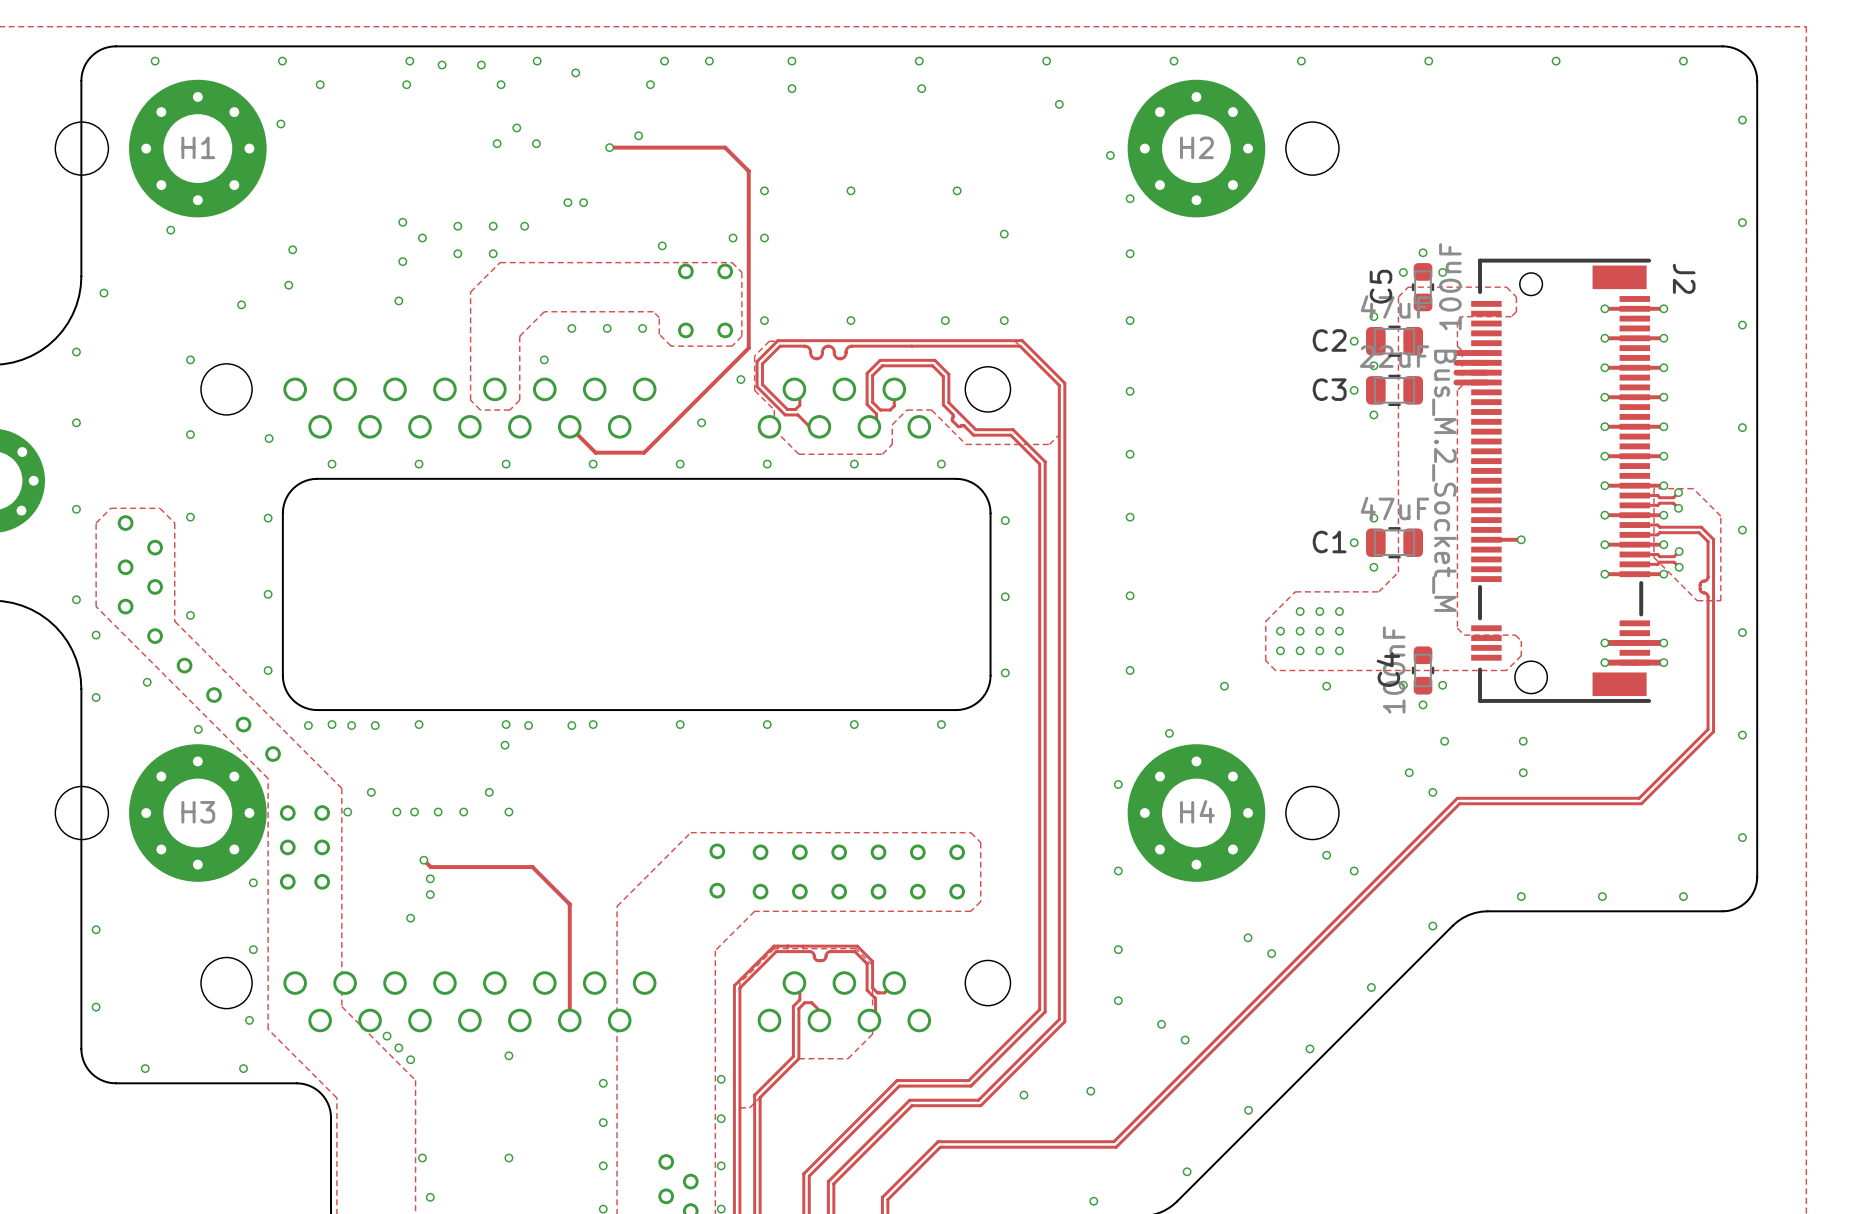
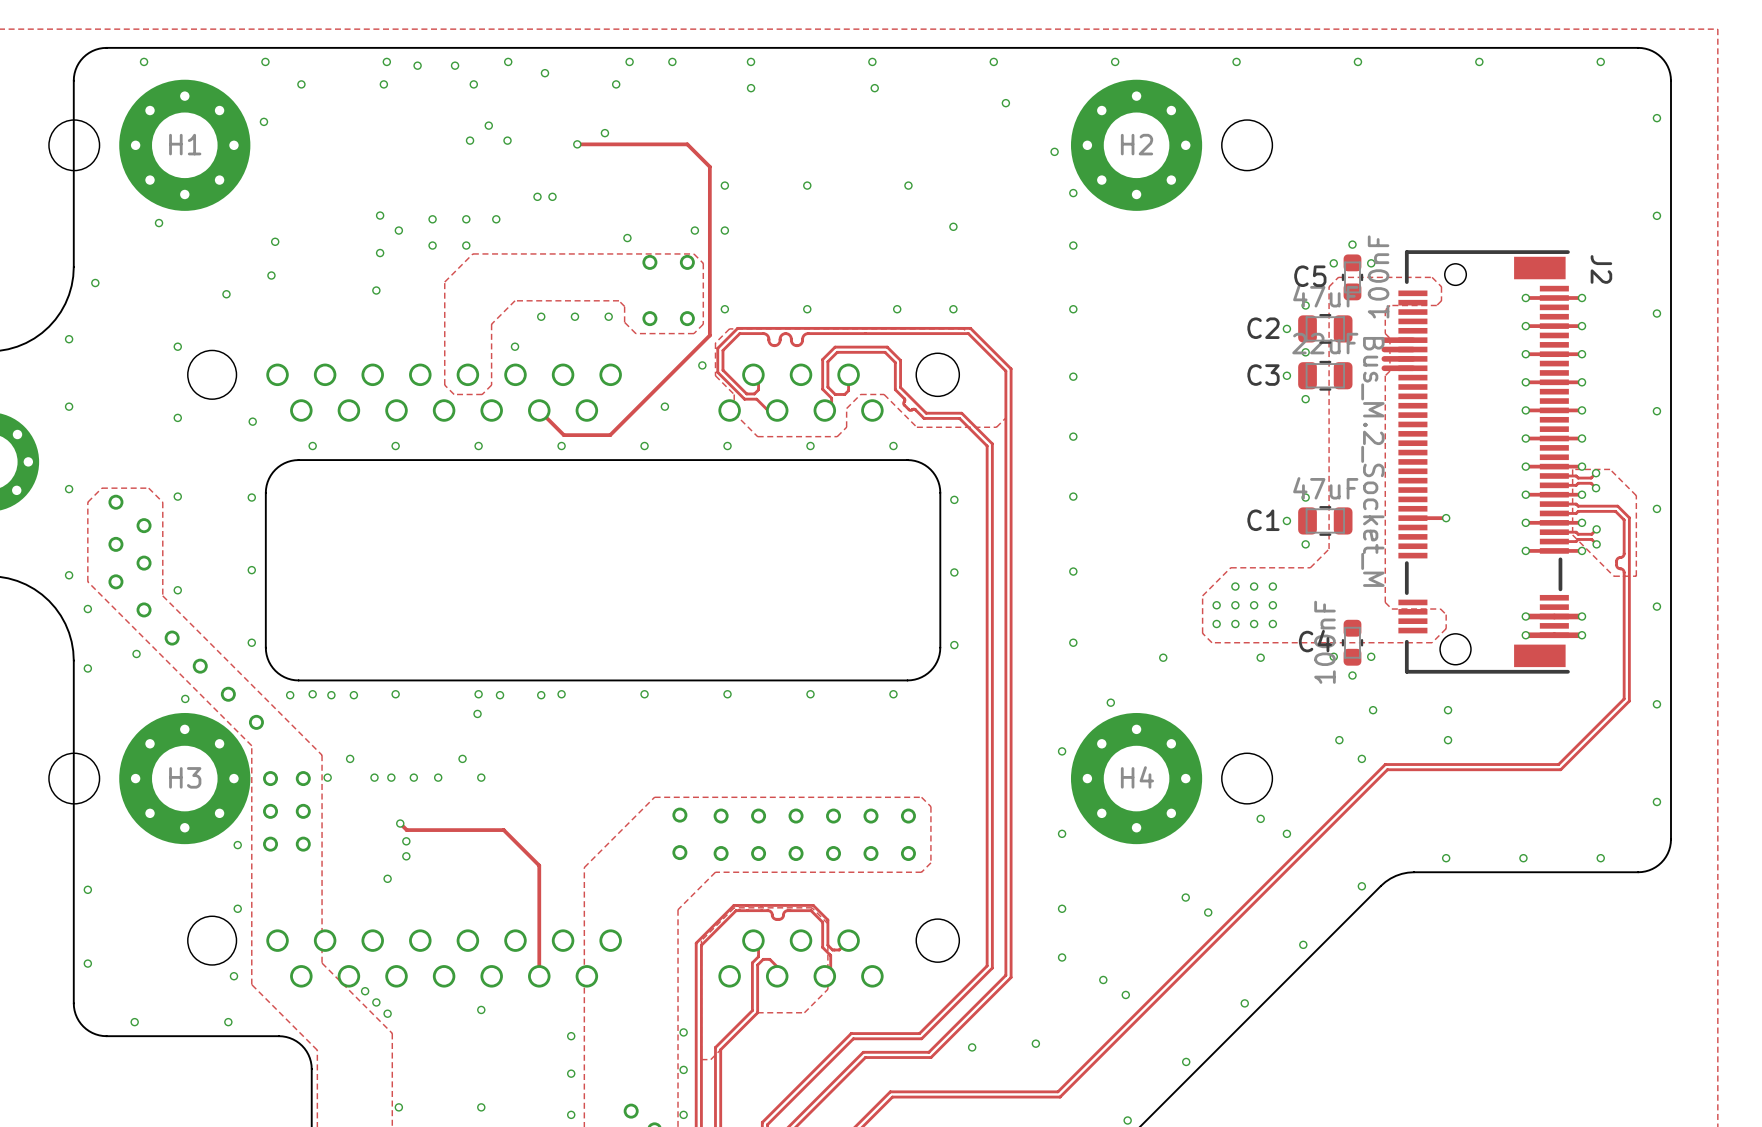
C5 name rotation: 0° (1381, 286) -> 90° clockwise (1310, 276)
C4 name rotation: 0° (1388, 669) -> 90° clockwise (1315, 641)

